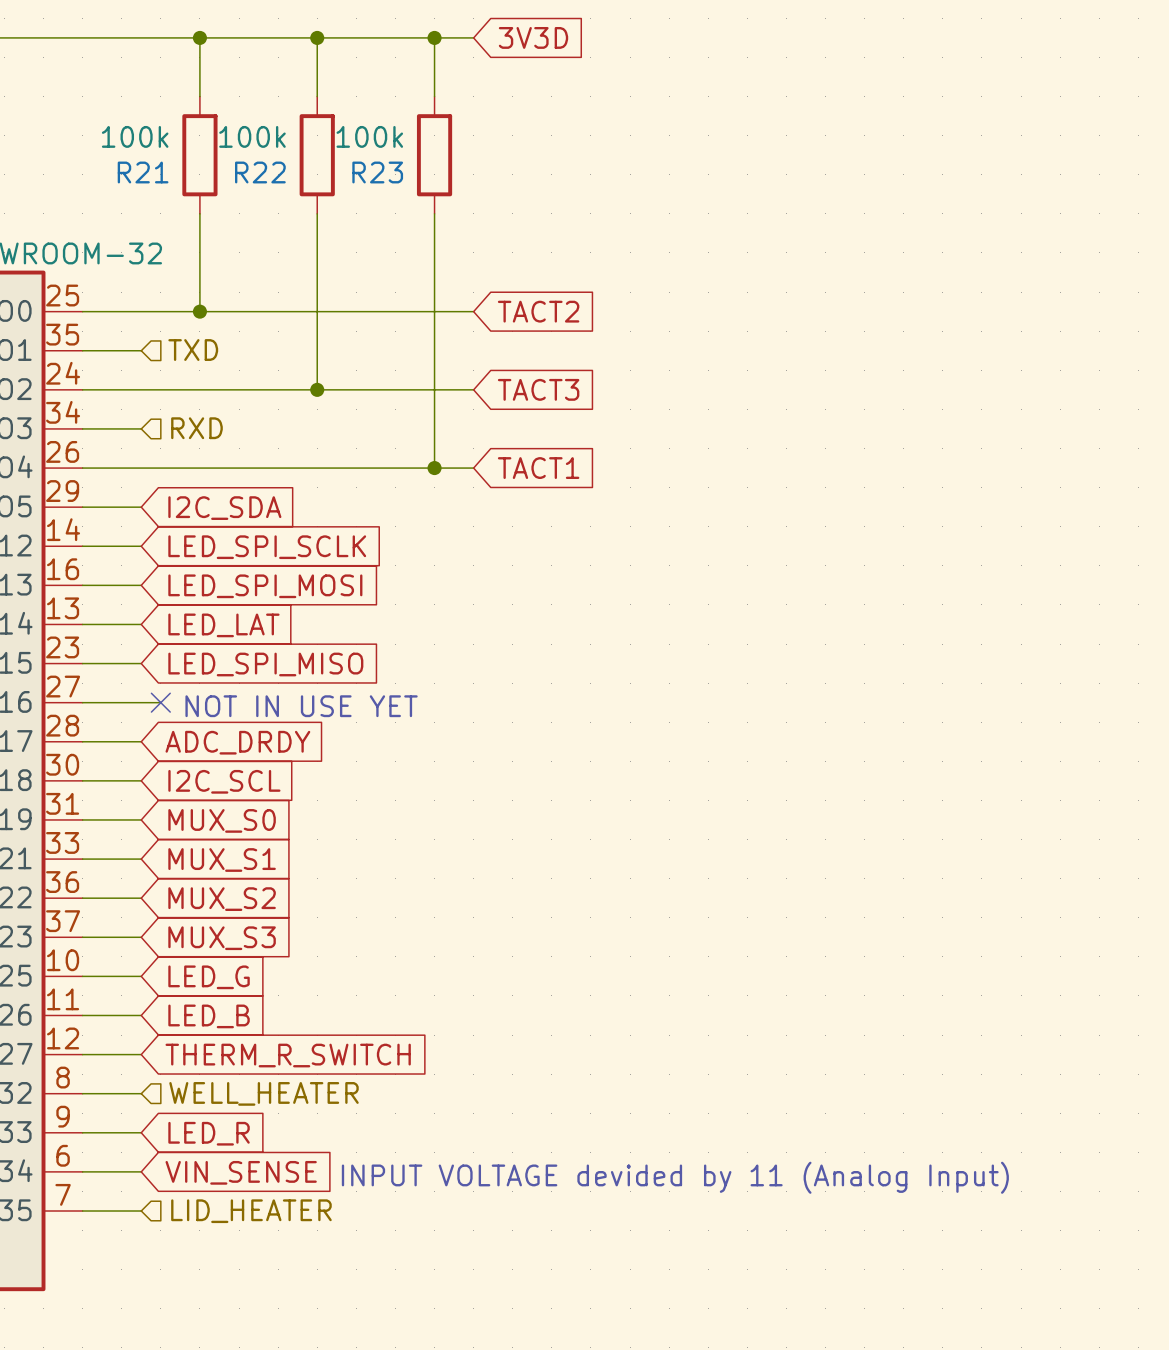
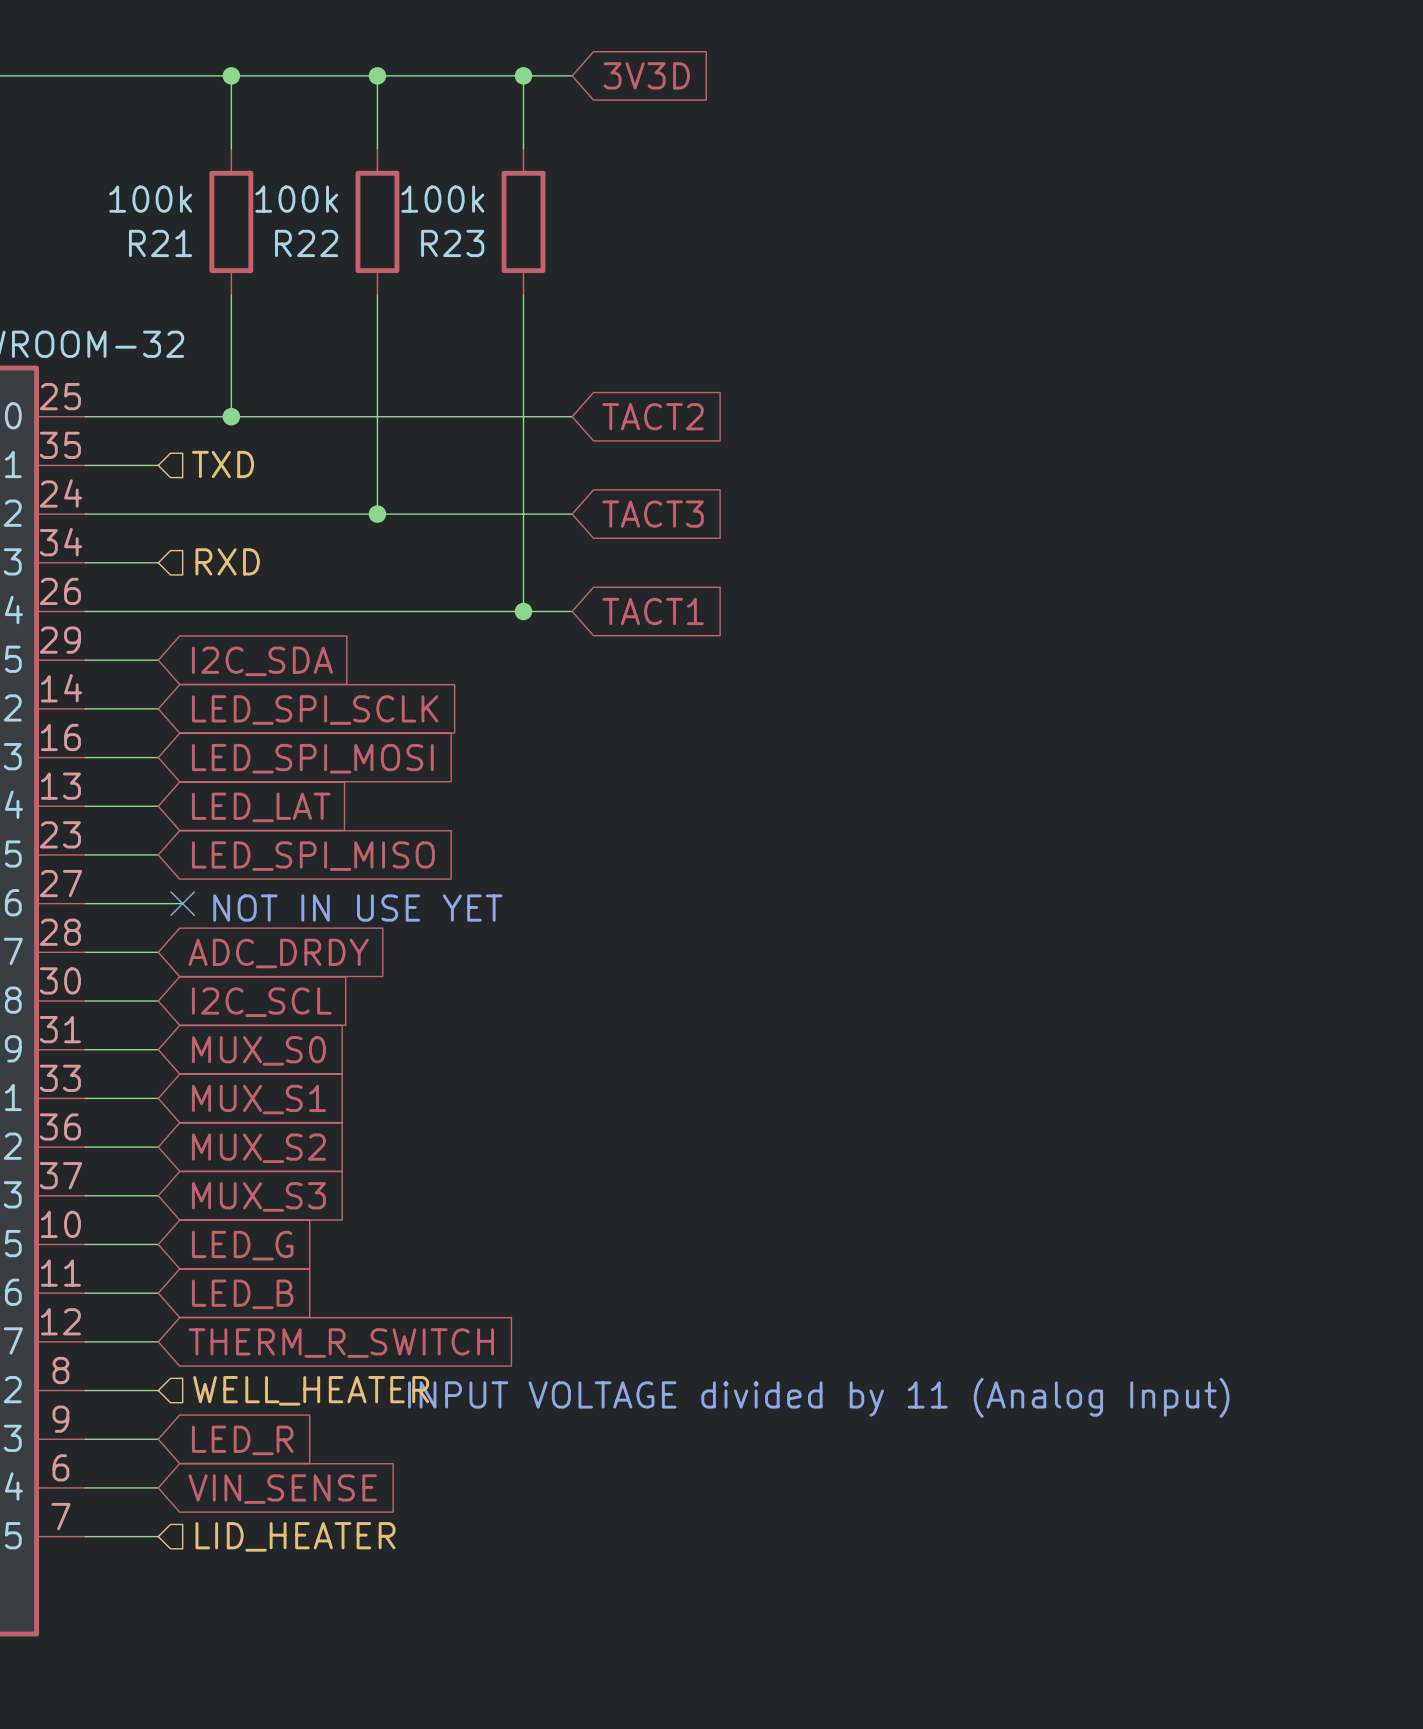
text: none -> INPUT VOLTAGE divided by 11 (Analog Input) (818, 1397)
text: INPUT VOLTAGE devided by 11 (Analog Input) (675, 1177) -> none

